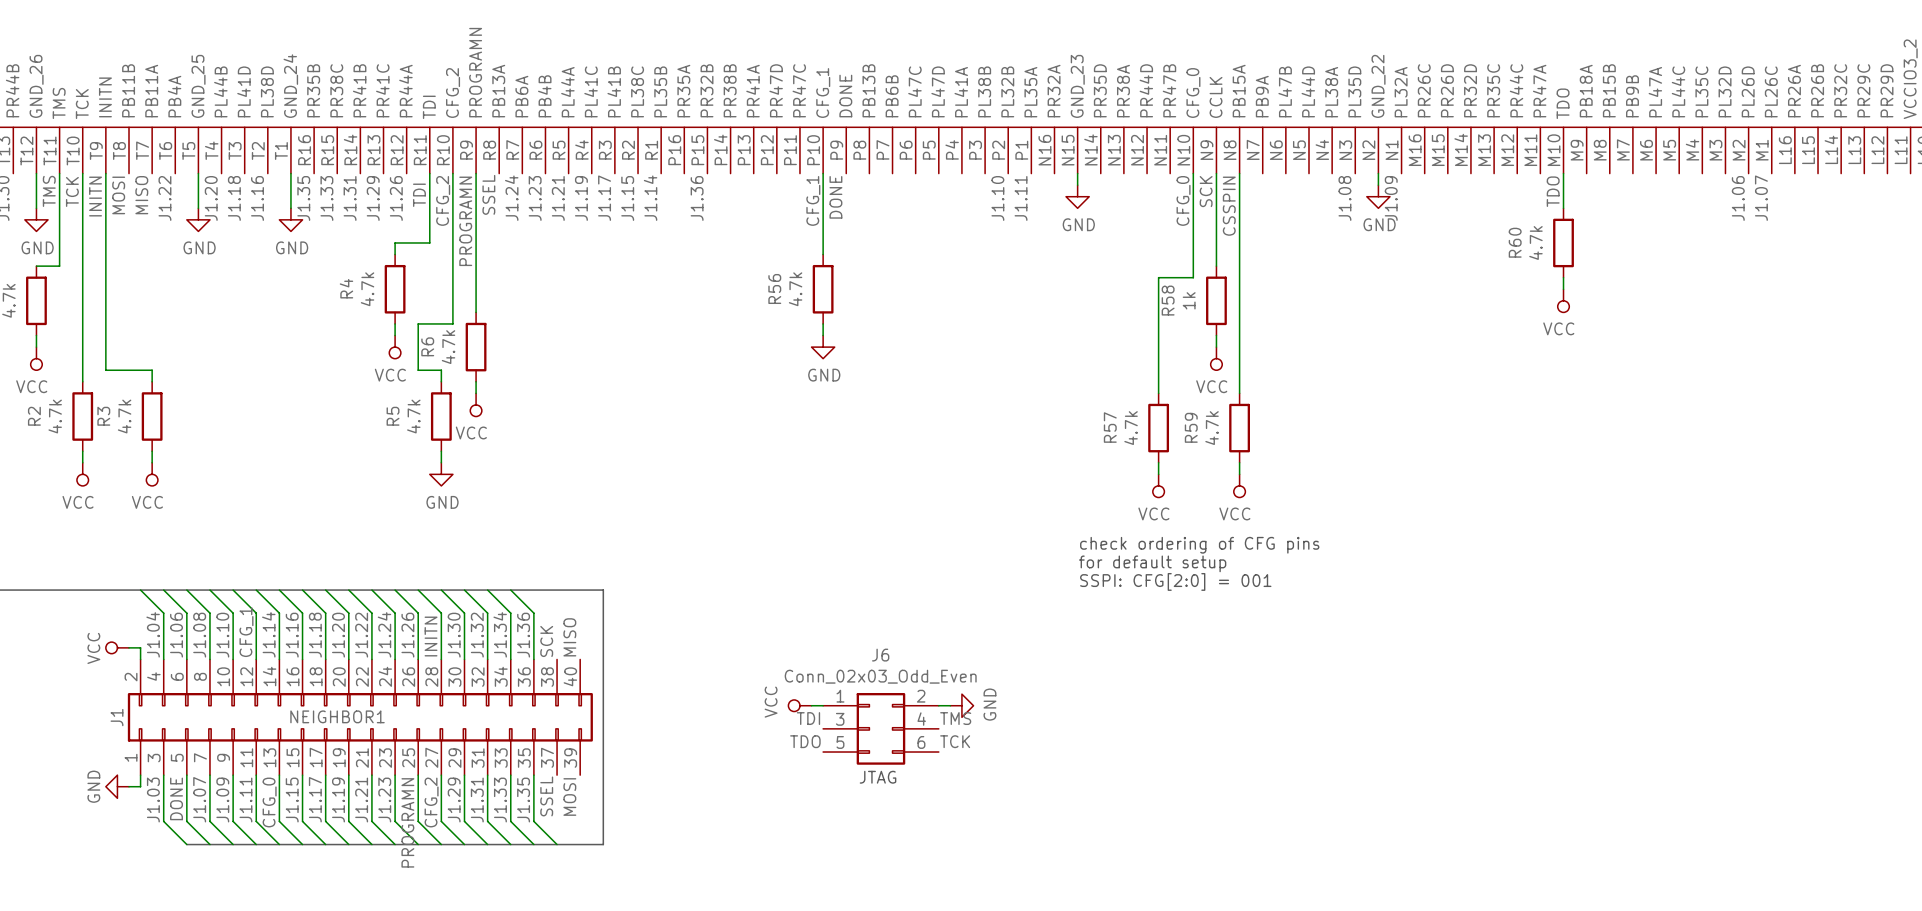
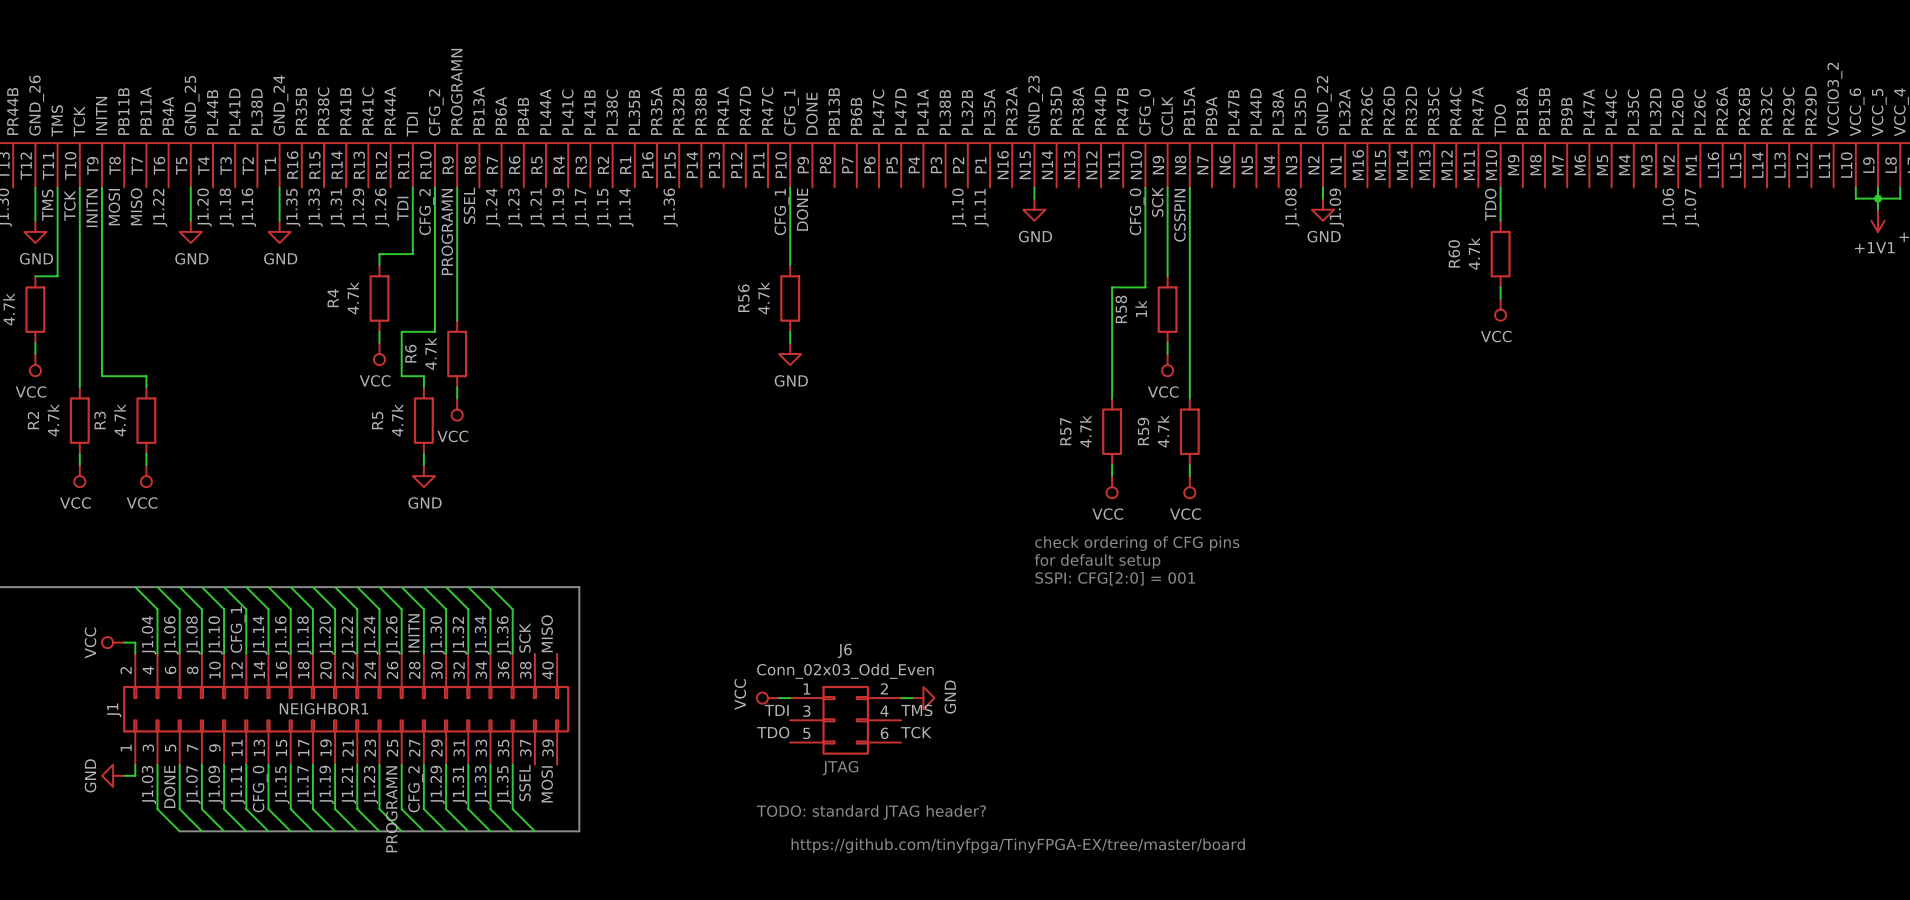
text: none -> TODO: standard JTAG header? (871, 812)
text: none -> https://github.com/tinyfpga/TinyFPGA-EX/tree/master/board (1018, 845)

